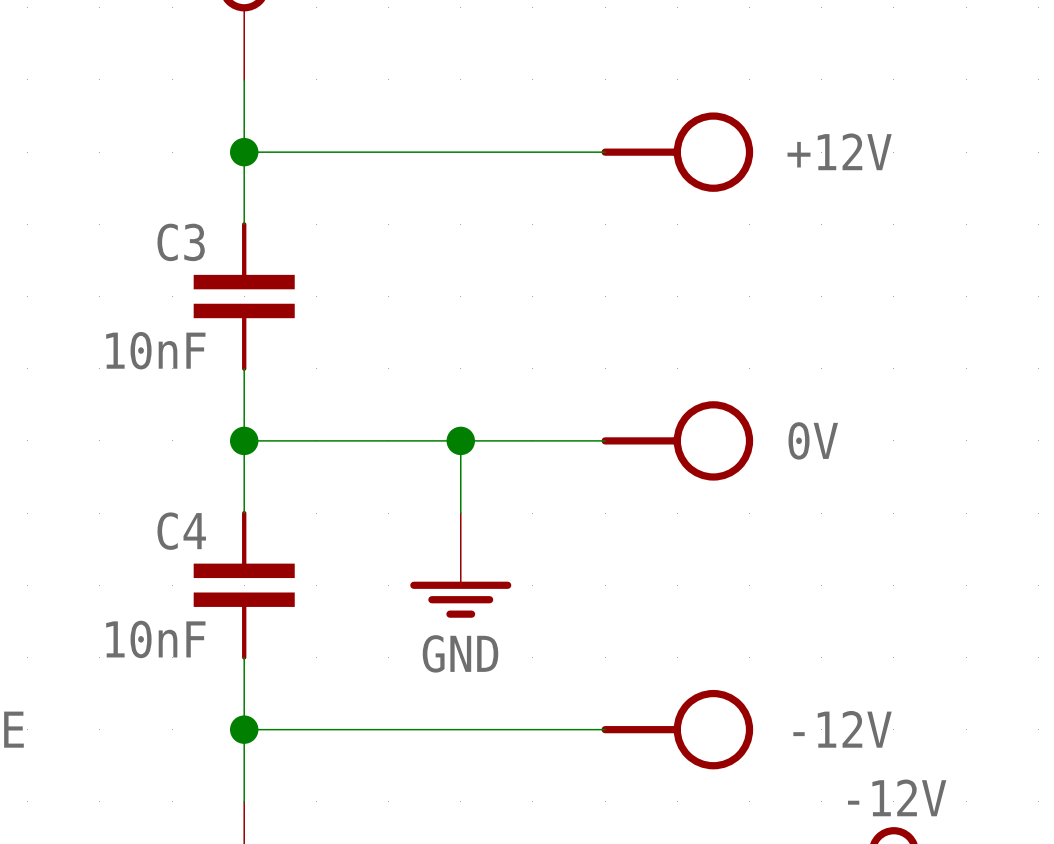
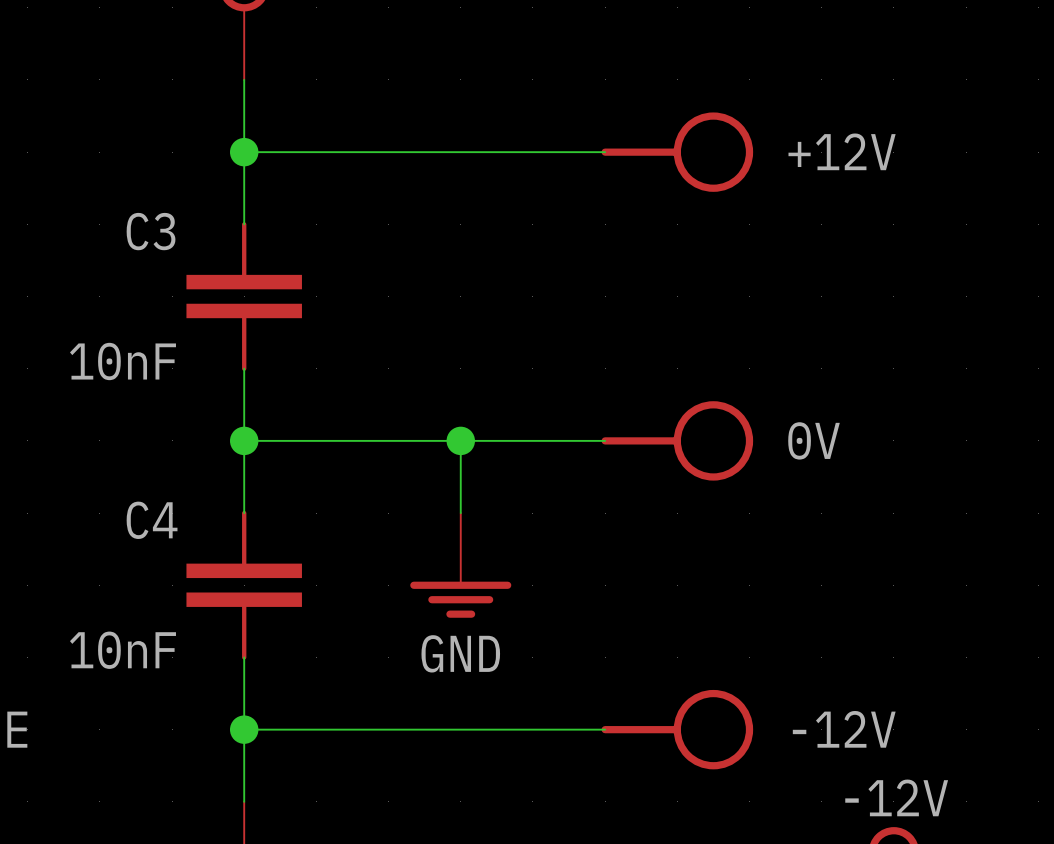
C3 symbol: [193, 222, 295, 371] -> [186, 222, 302, 371]
C3 name position: C3 (181, 242) -> C3 (151, 231)
C3 value position: 10nF (155, 350) -> 10nF (122, 361)
C4 symbol: [193, 510, 295, 660] -> [186, 510, 302, 660]
C4 name position: C4 (181, 531) -> C4 (152, 520)
C4 value position: 10nF (155, 639) -> 10nF (122, 650)

